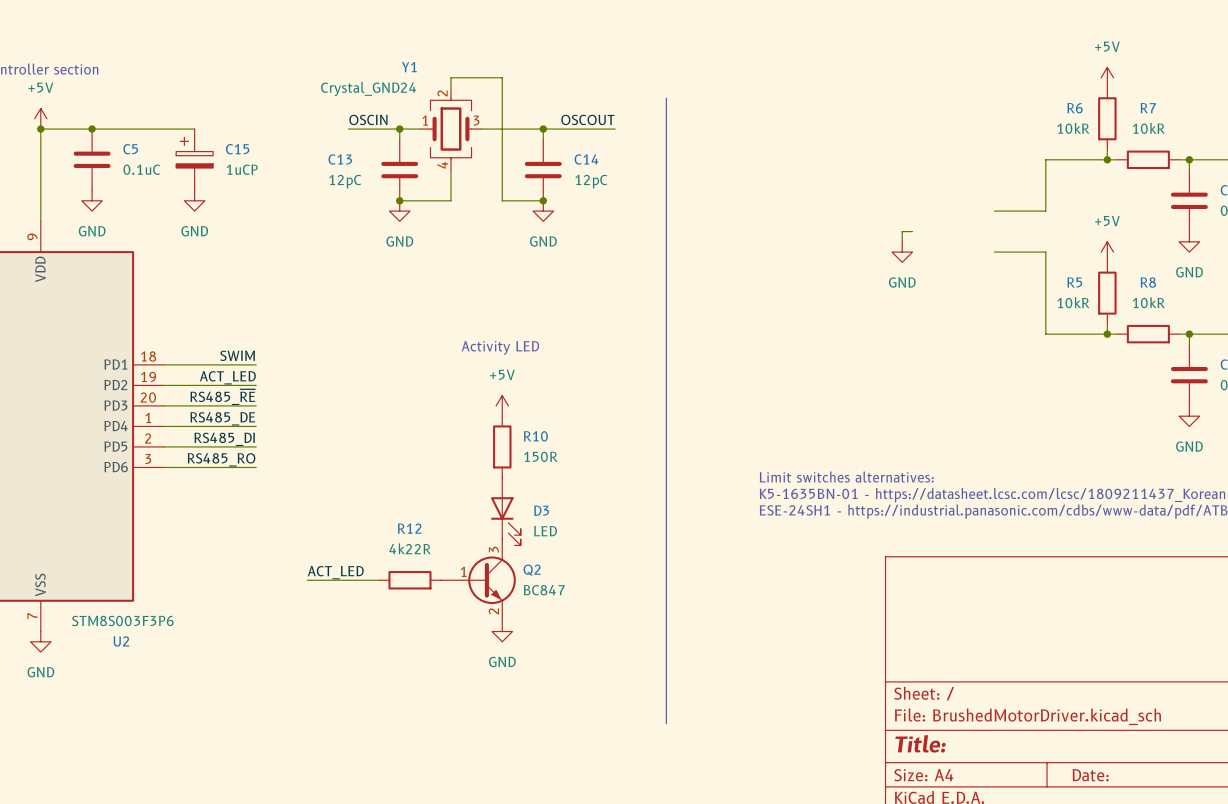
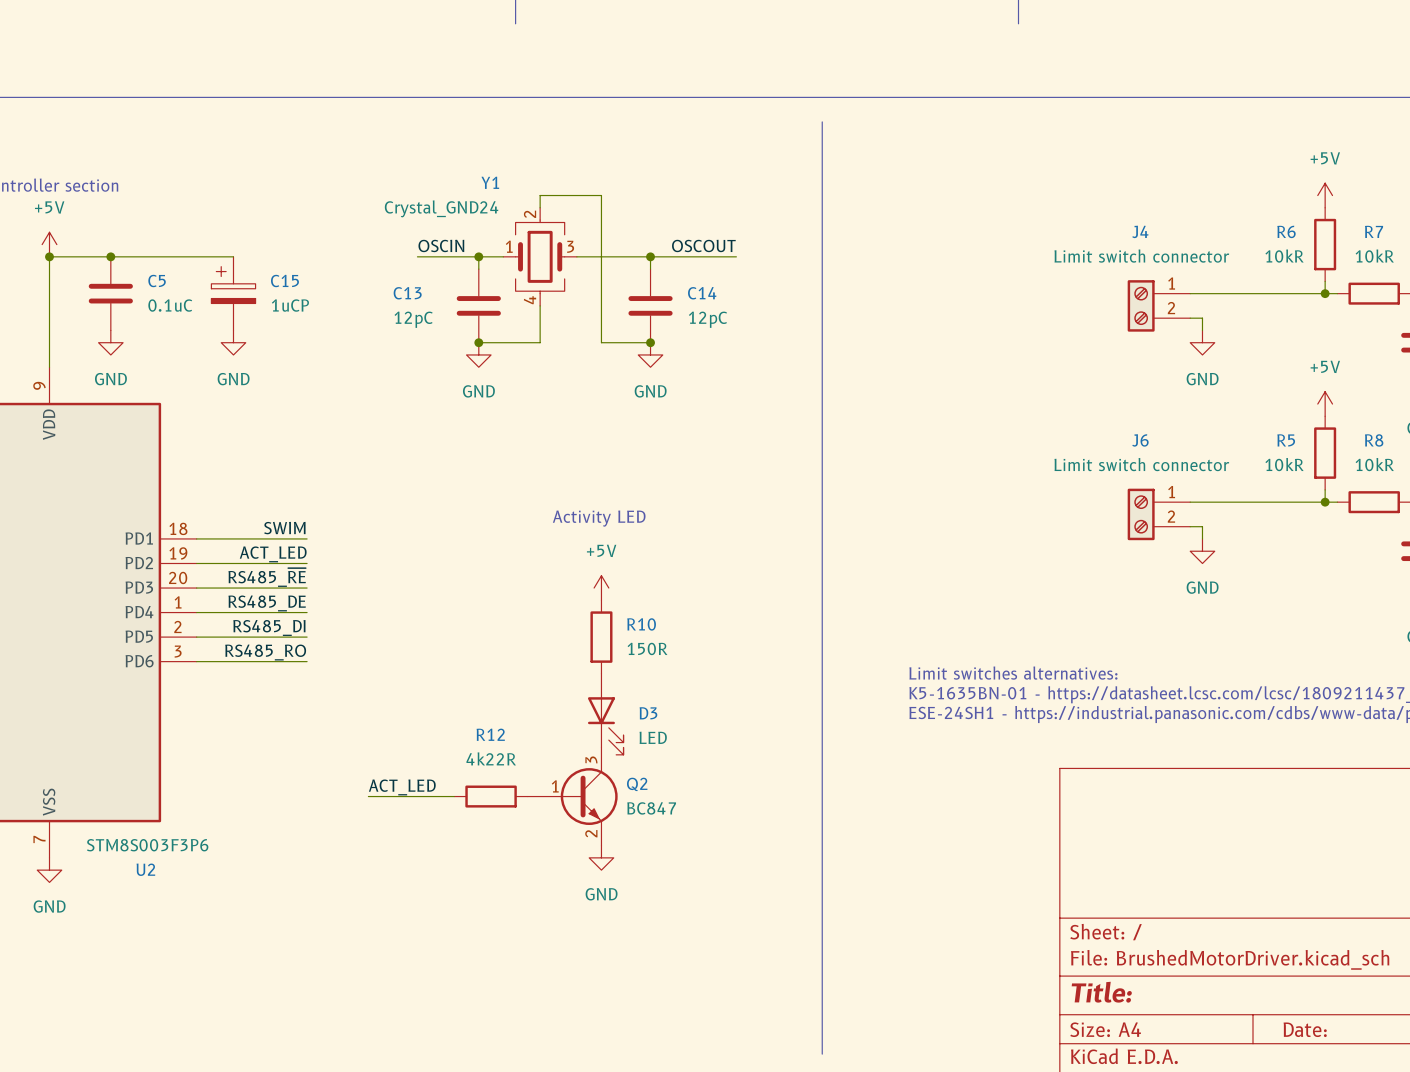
line: none -> (822, 121) (822, 1054)
line: (666, 98) (666, 723) -> none
wire: (1045, 159) (1045, 211) (994, 211) -> (1251, 293) (1190, 293)
J4: none -> Limit switch connector (1158, 305)
wire: none -> (1190, 318) (1202, 318) (1202, 330)
power symbol: none -> GND (1202, 342)
wire: (912, 231) (902, 231) (902, 241) -> none
power symbol: GND (902, 252) -> none
wire: (994, 252) (1045, 252) (1045, 334) -> (1190, 502) (1251, 502)
J6: none -> Limit switch connector (1158, 514)
wire: none -> (1190, 526) (1202, 526) (1202, 538)
power symbol: none -> GND (1202, 551)

